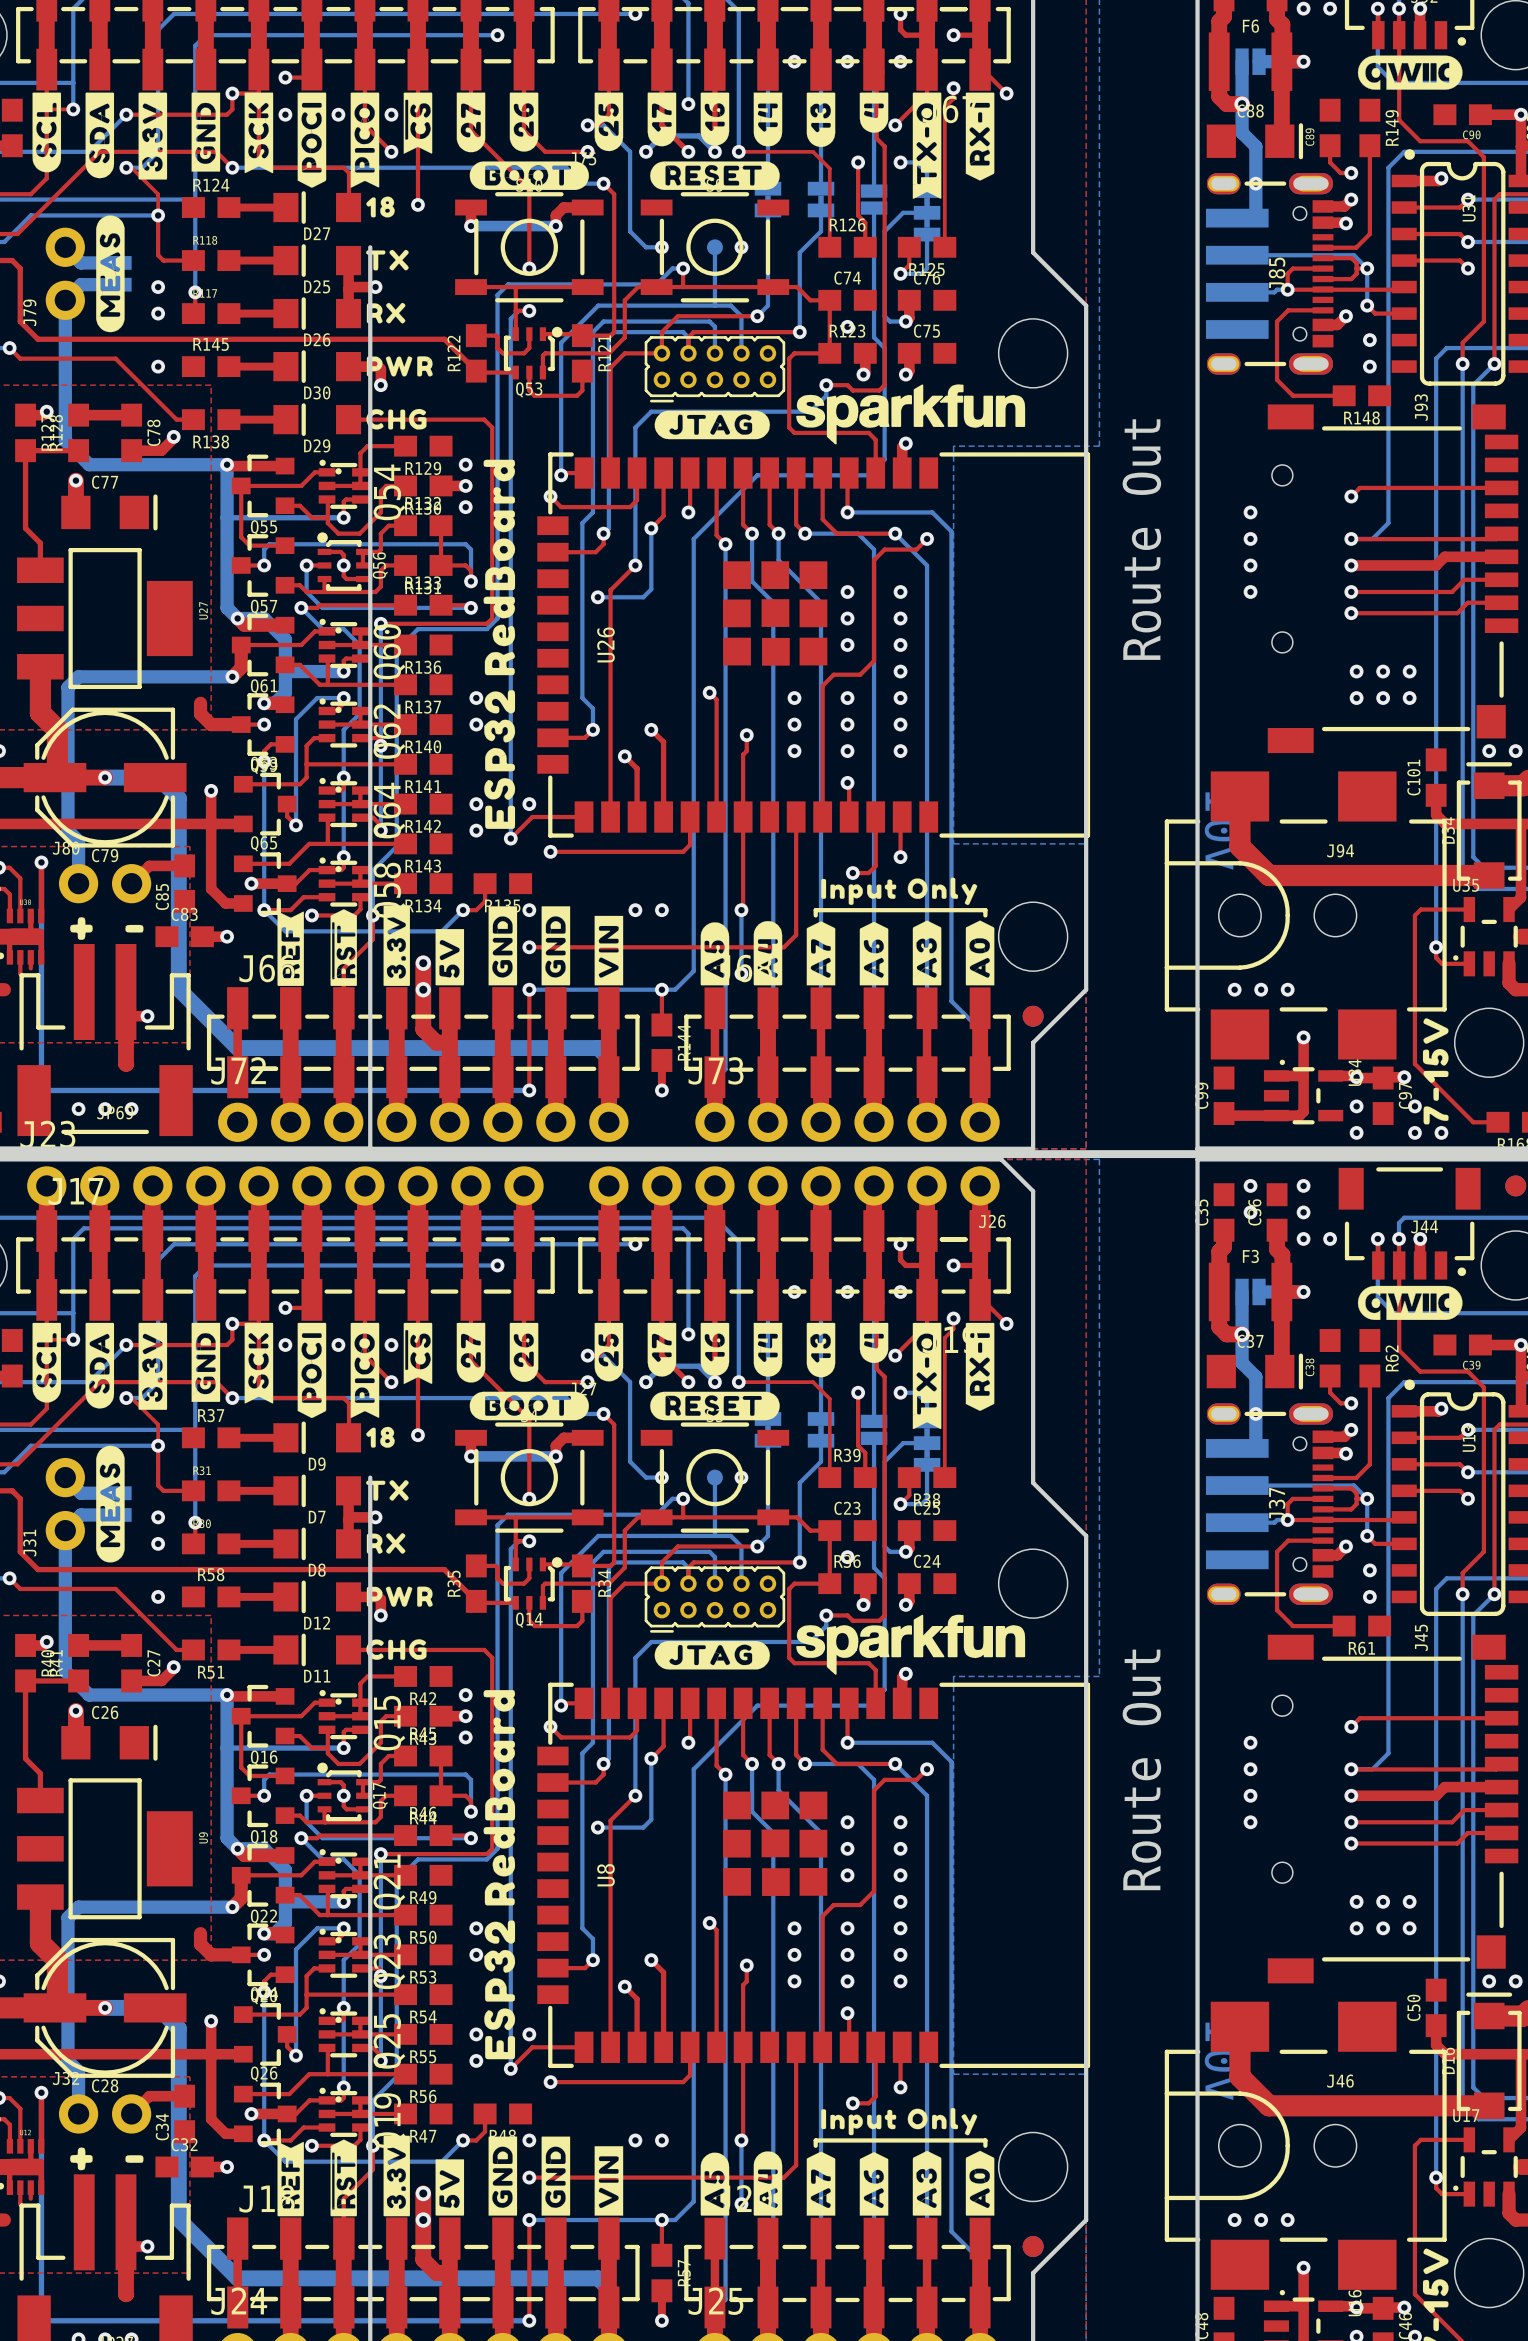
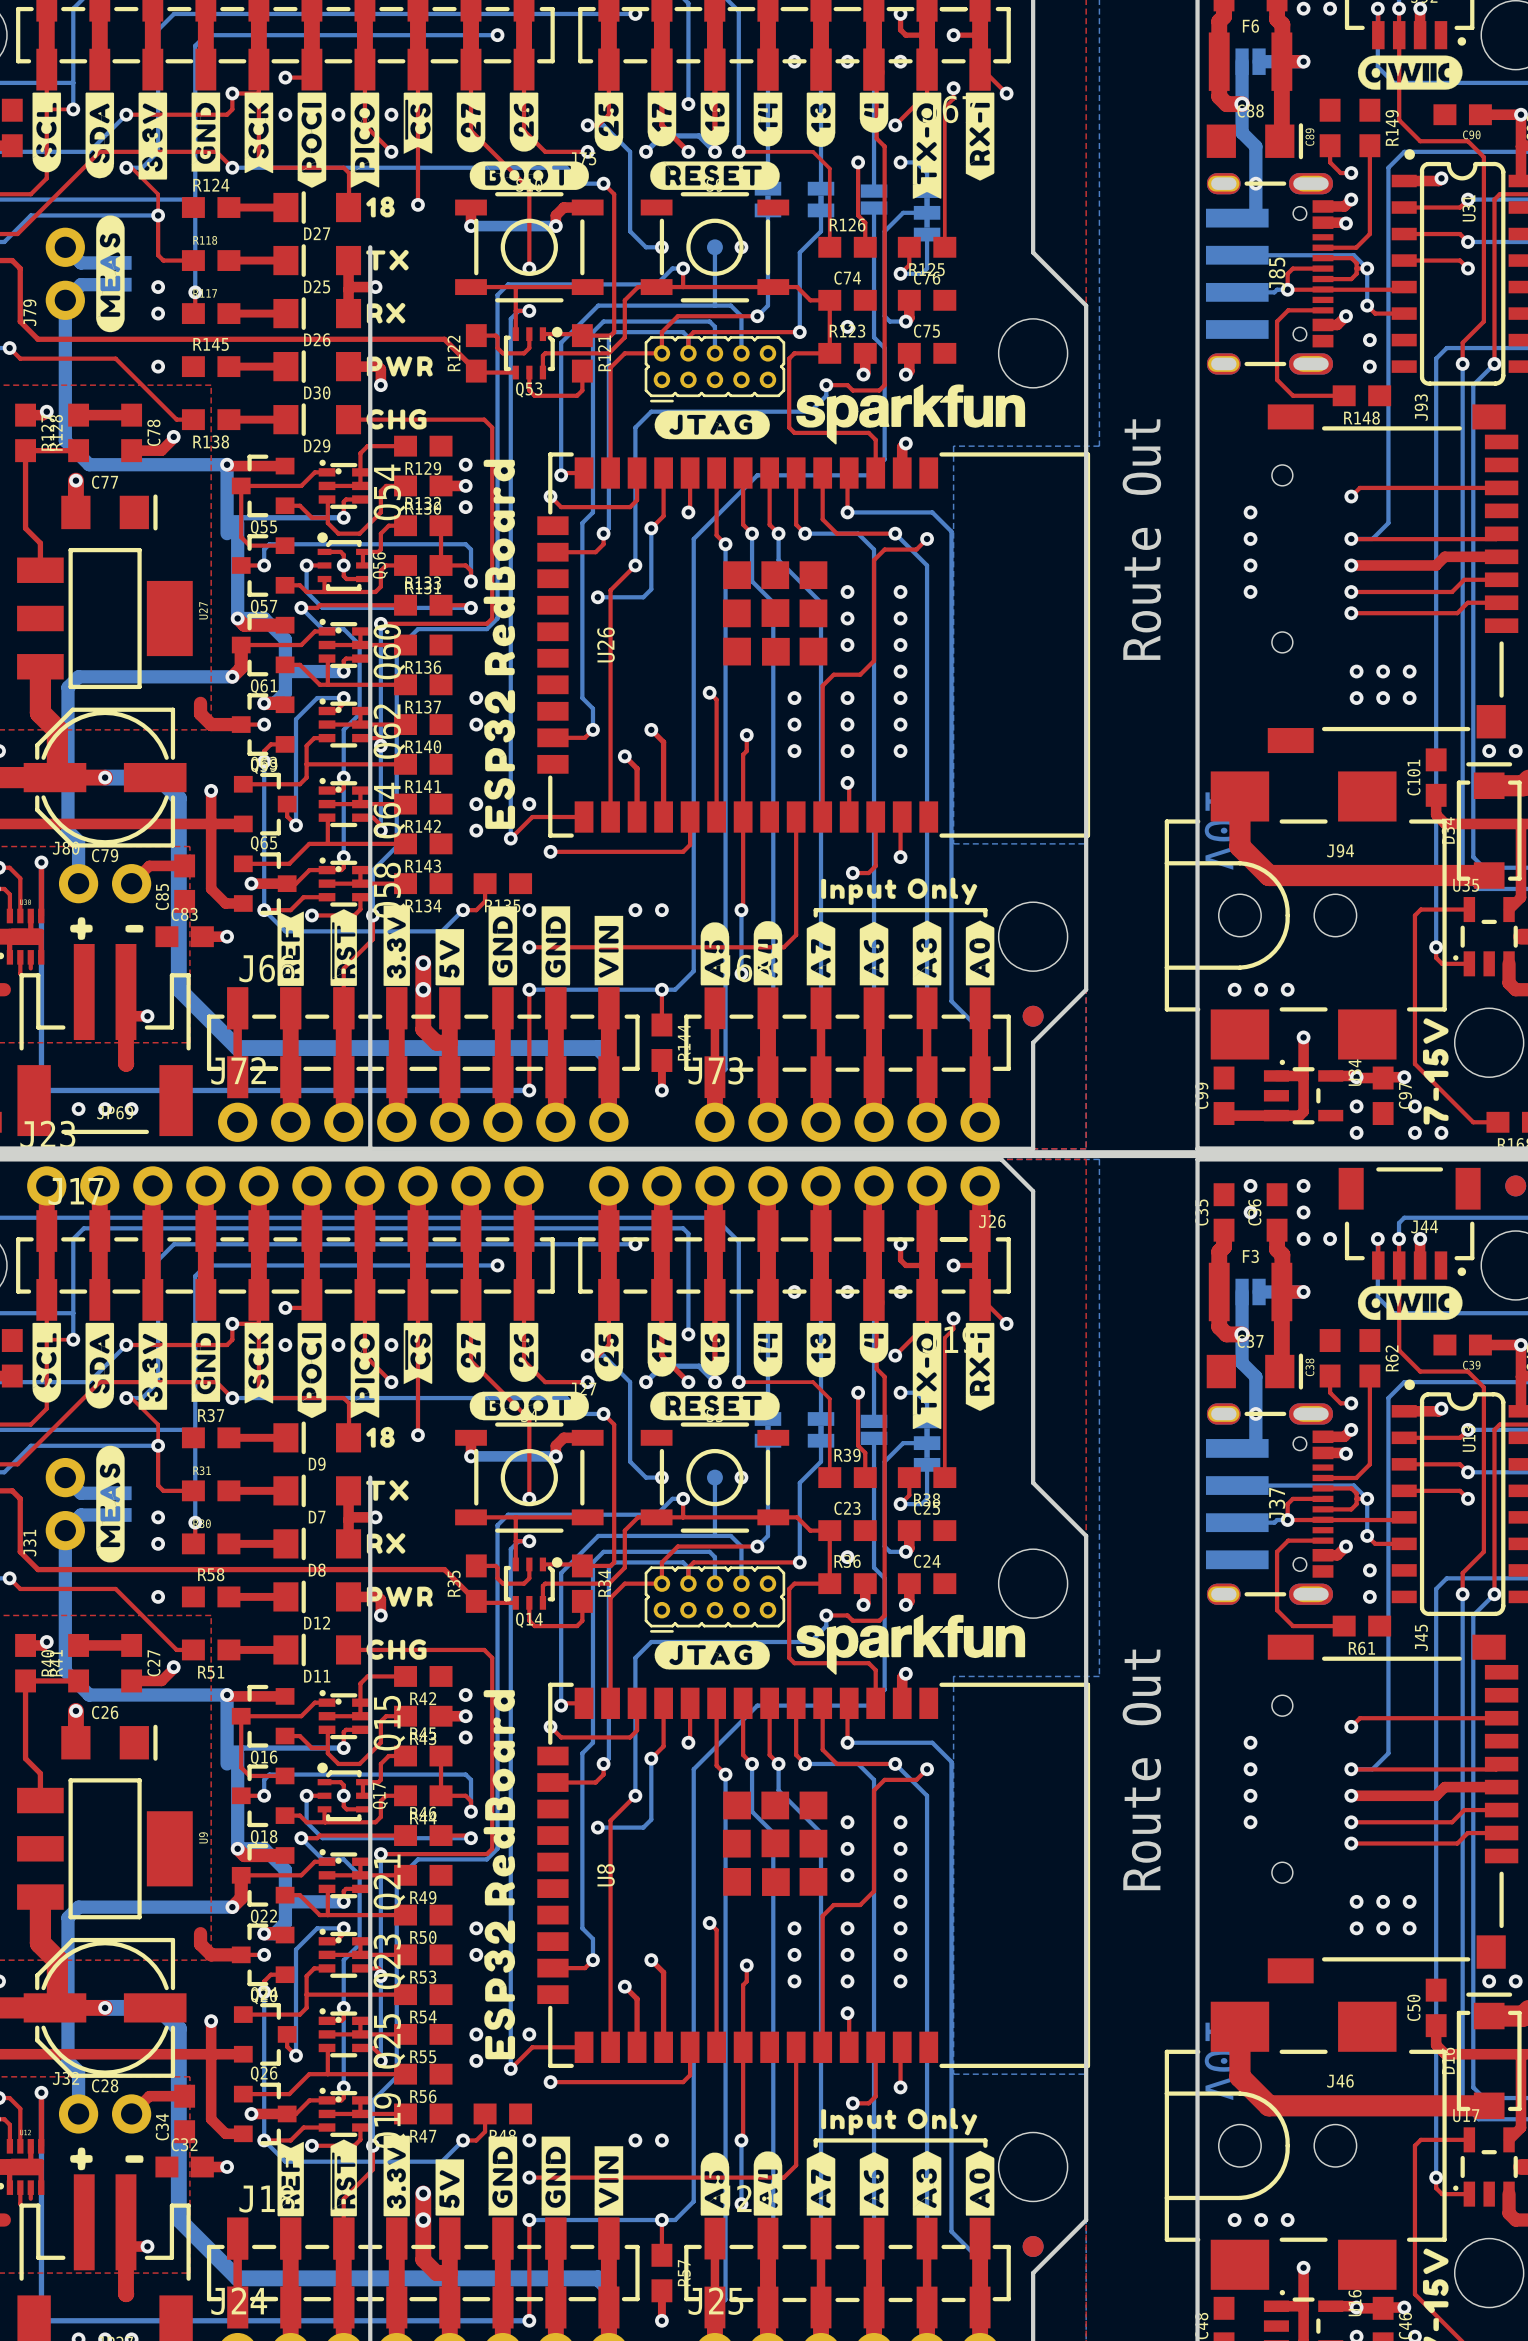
bottom track: (227, 533) (227, 607) (237, 618) -> (237, 523) (237, 618)
bottom track: (227, 1763) (227, 1838) (237, 1848) -> (237, 1753) (237, 1848)

